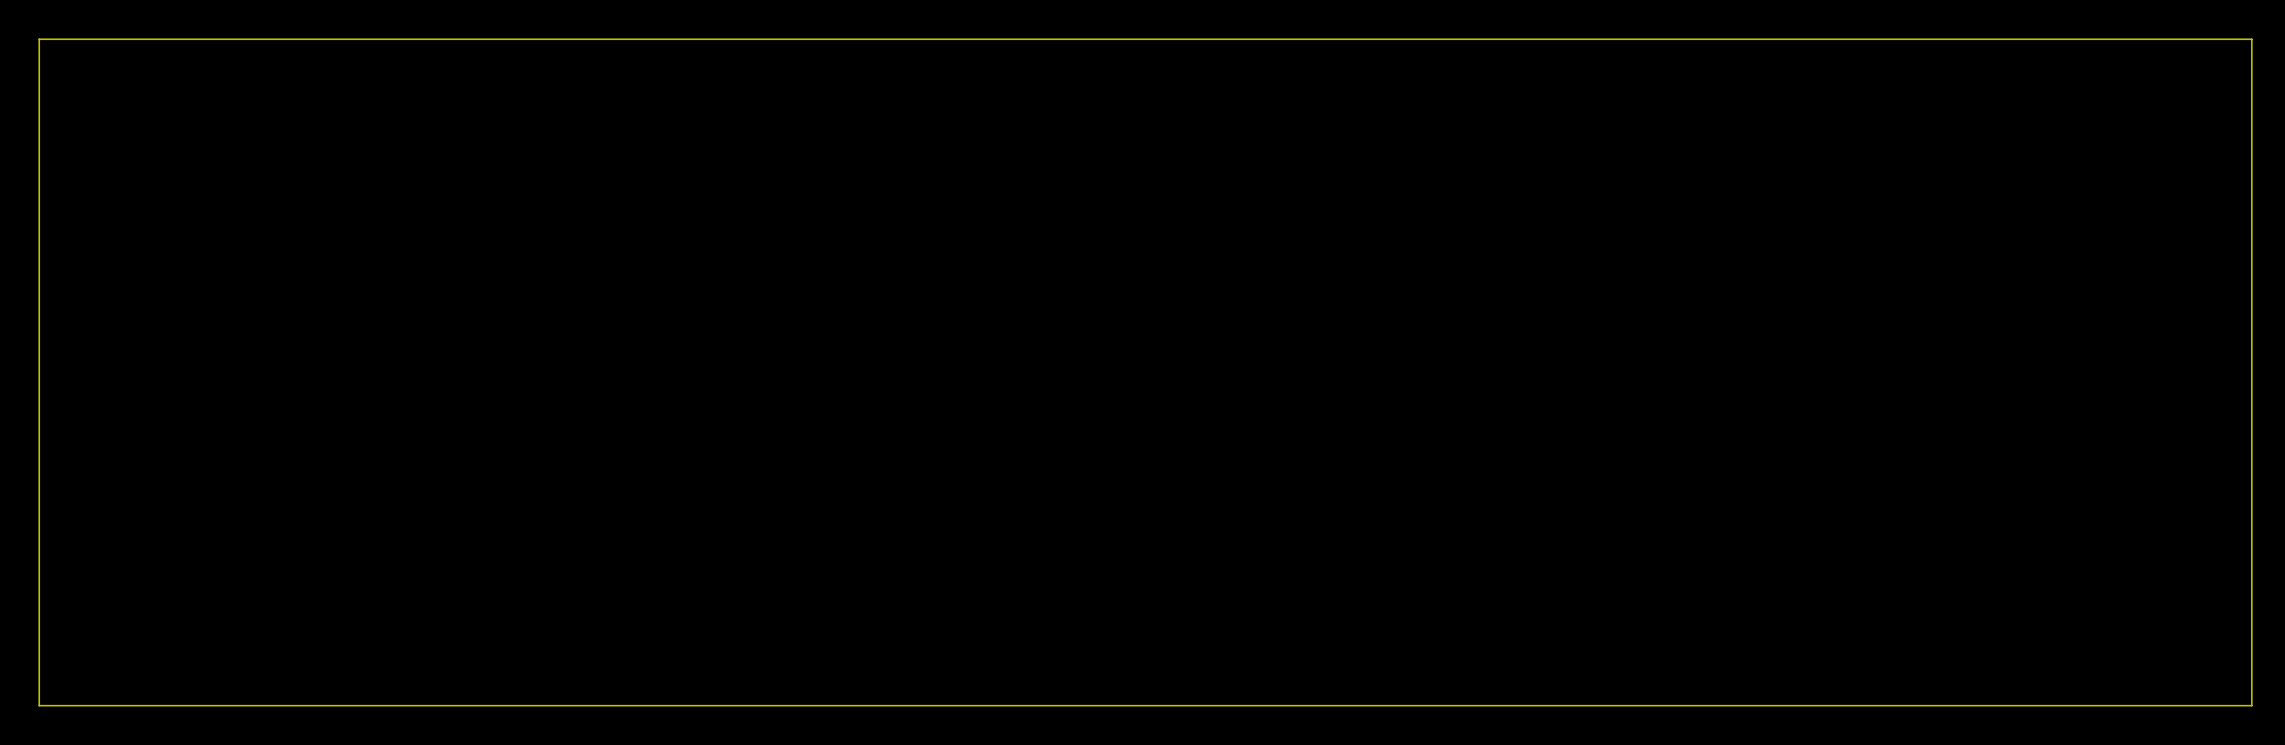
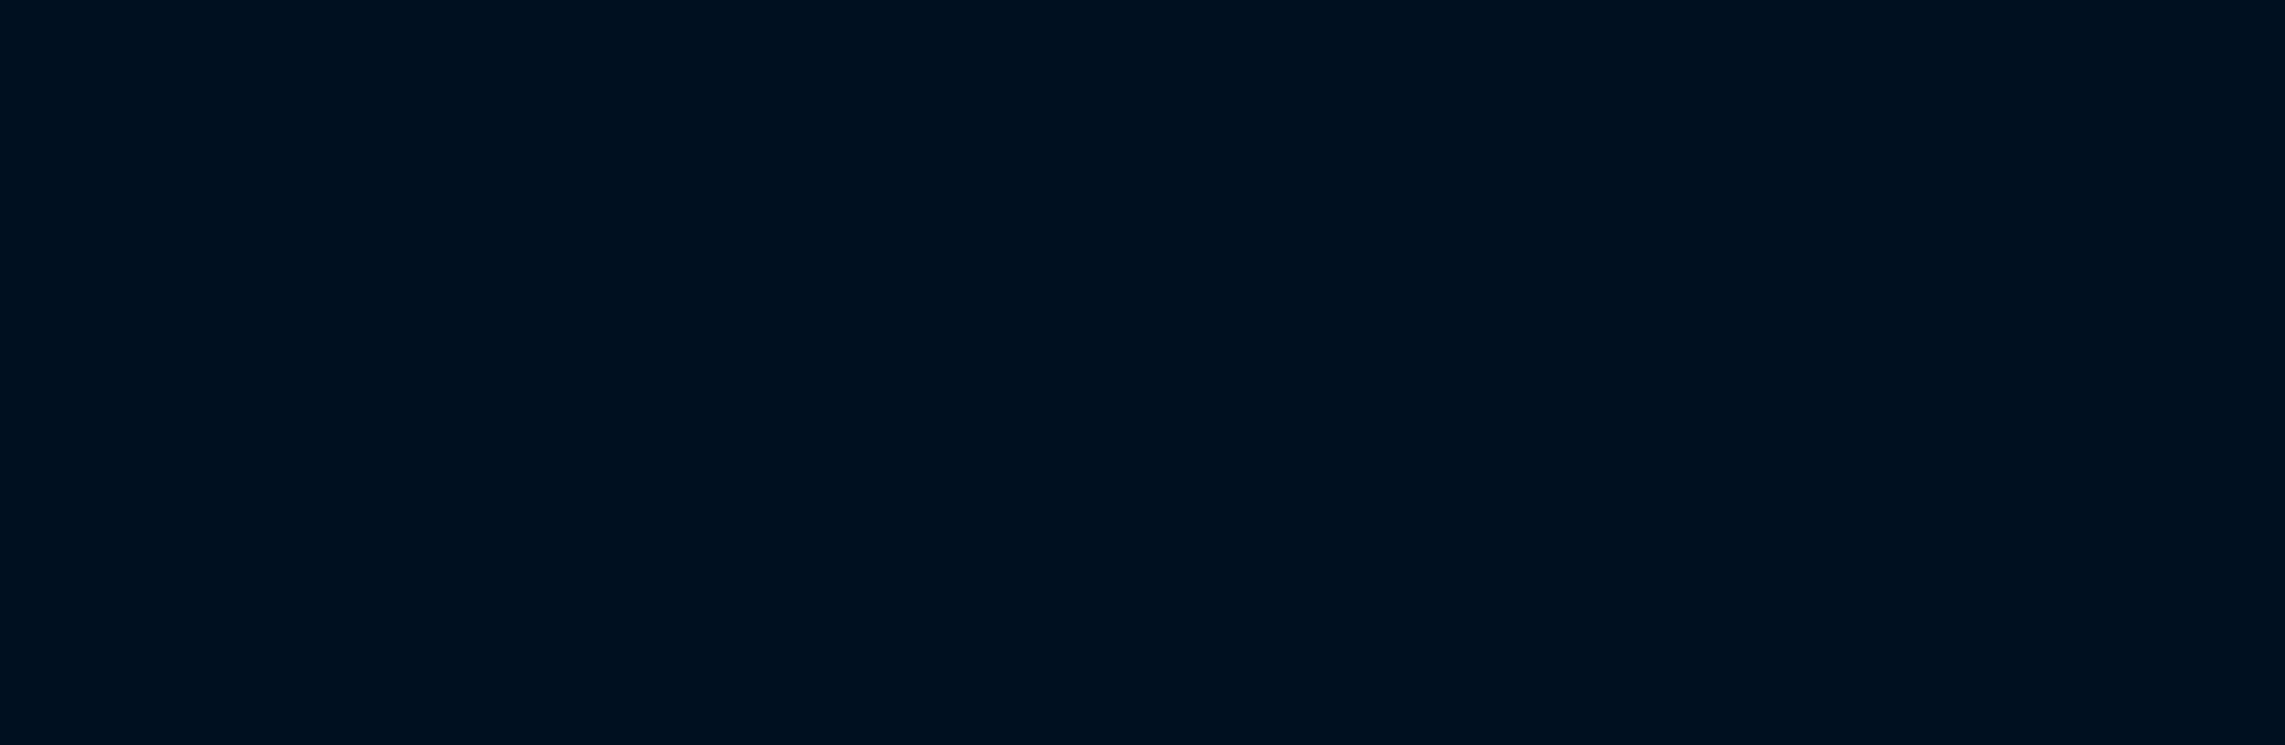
board edge: (2251, 39) (39, 39) (39, 705) (2251, 705) (2251, 39) -> none

